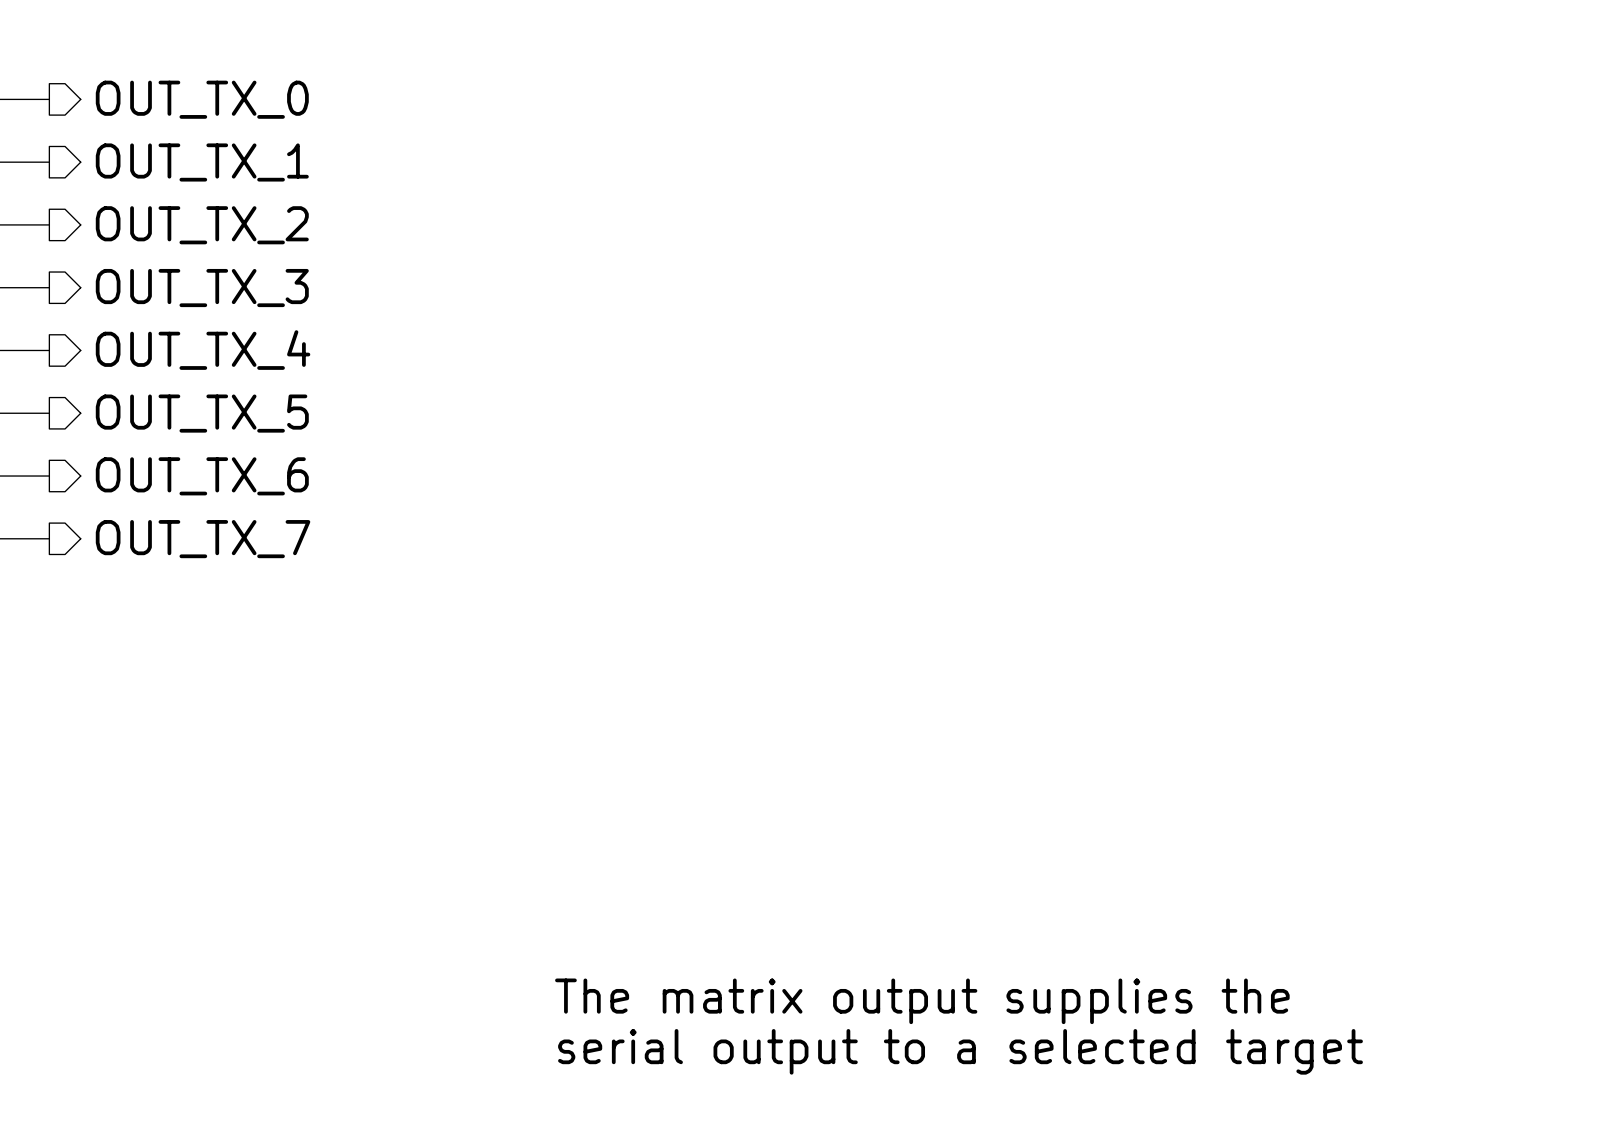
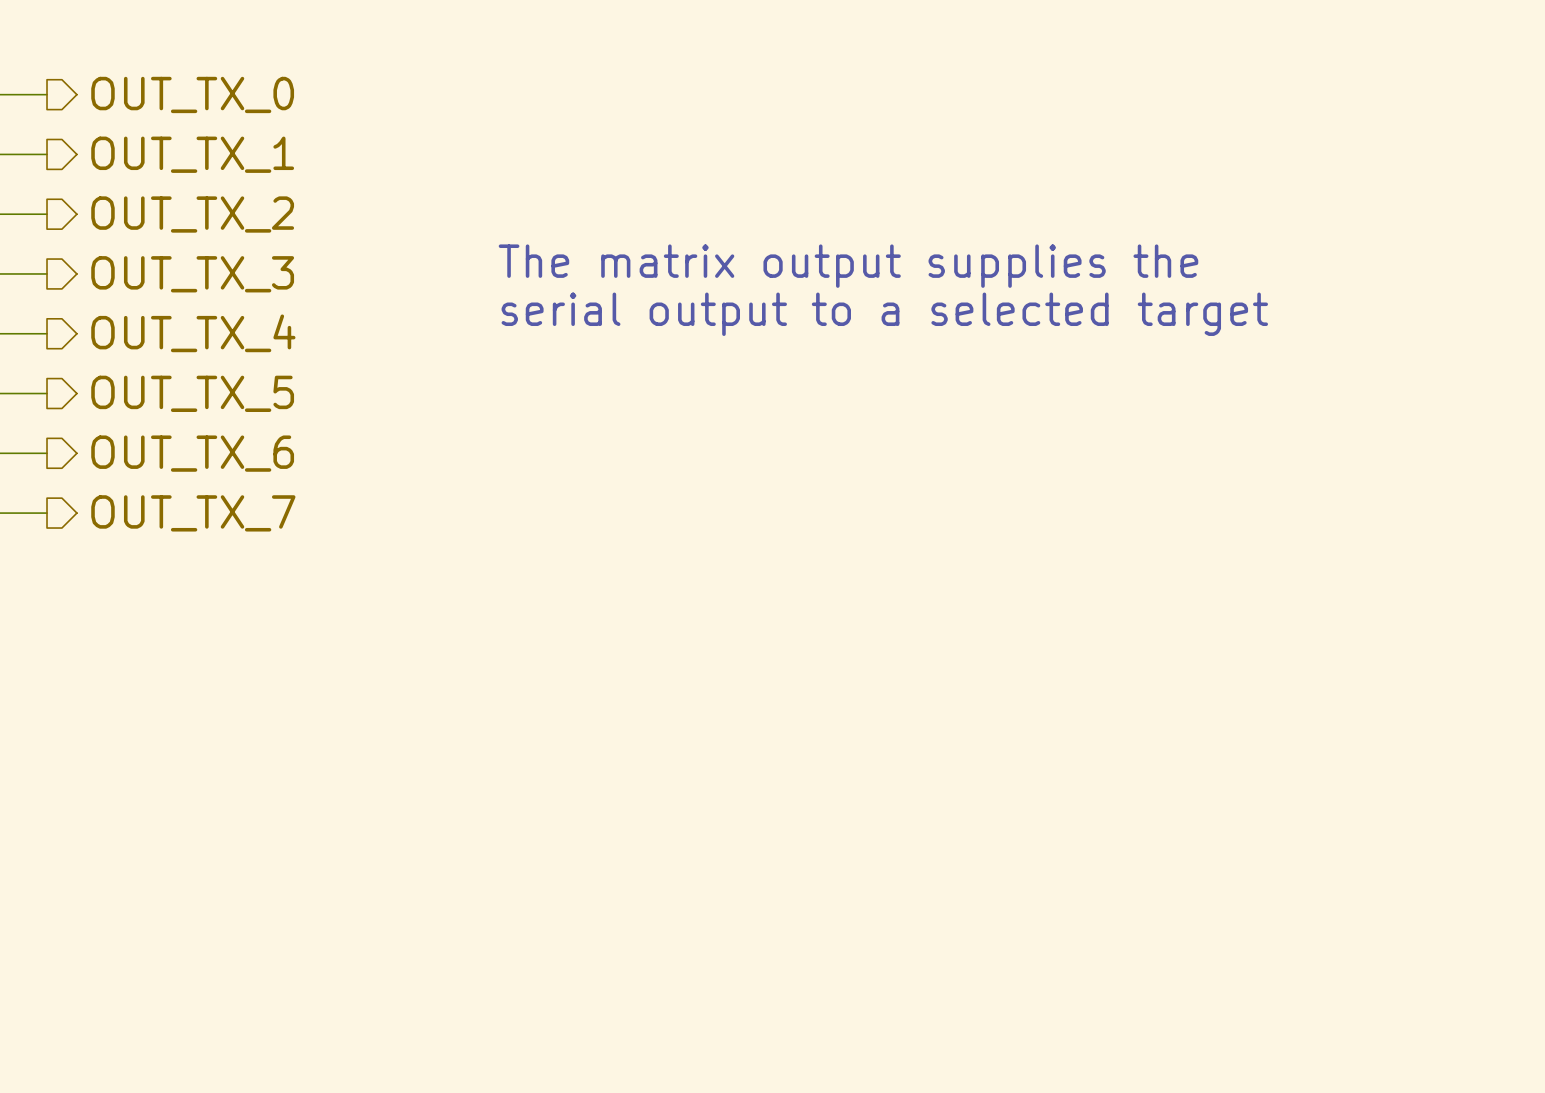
text: none -> The matrix output supplies the (848, 266)
text: none -> serial output to a selected target (884, 314)
text: The matrix output supplies the (922, 1001) -> none
text: serial output to a selected target (960, 1051) -> none

